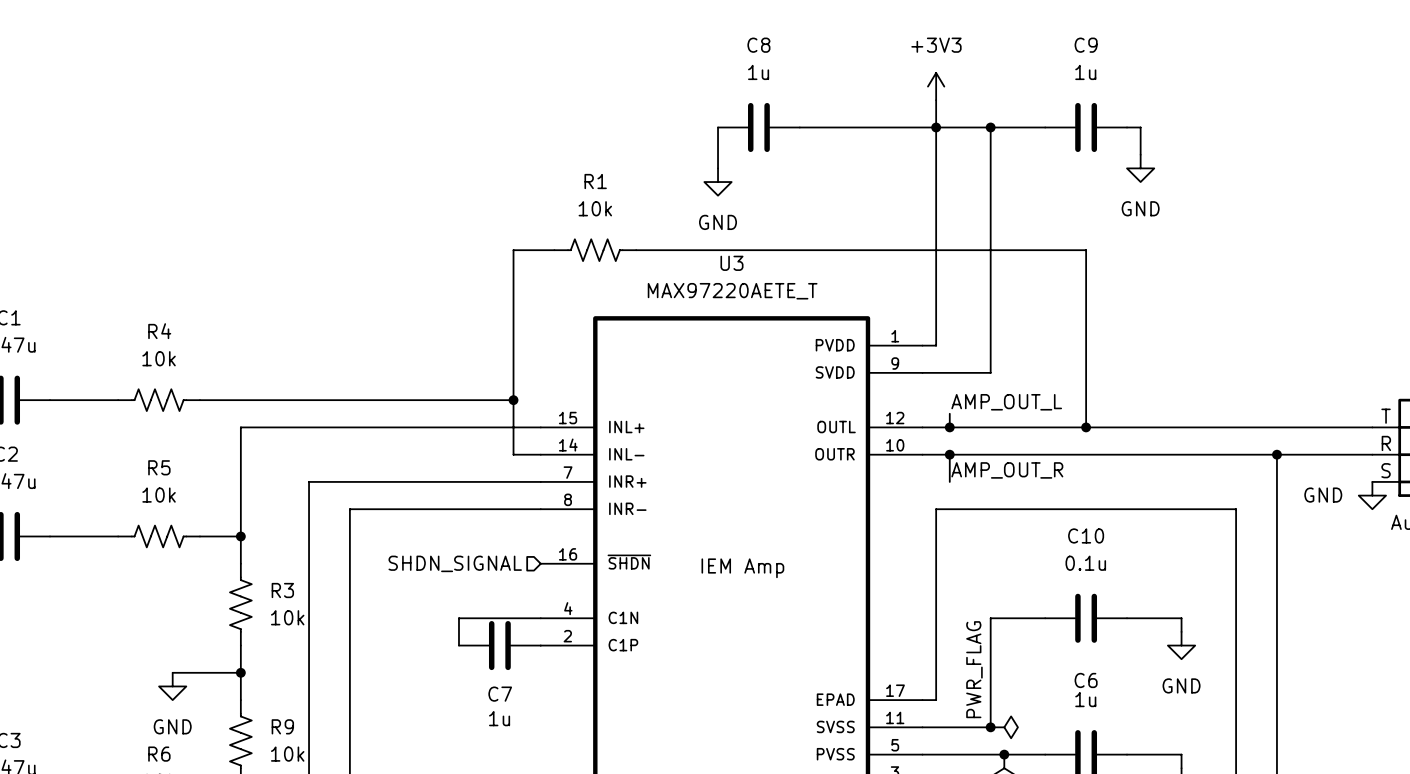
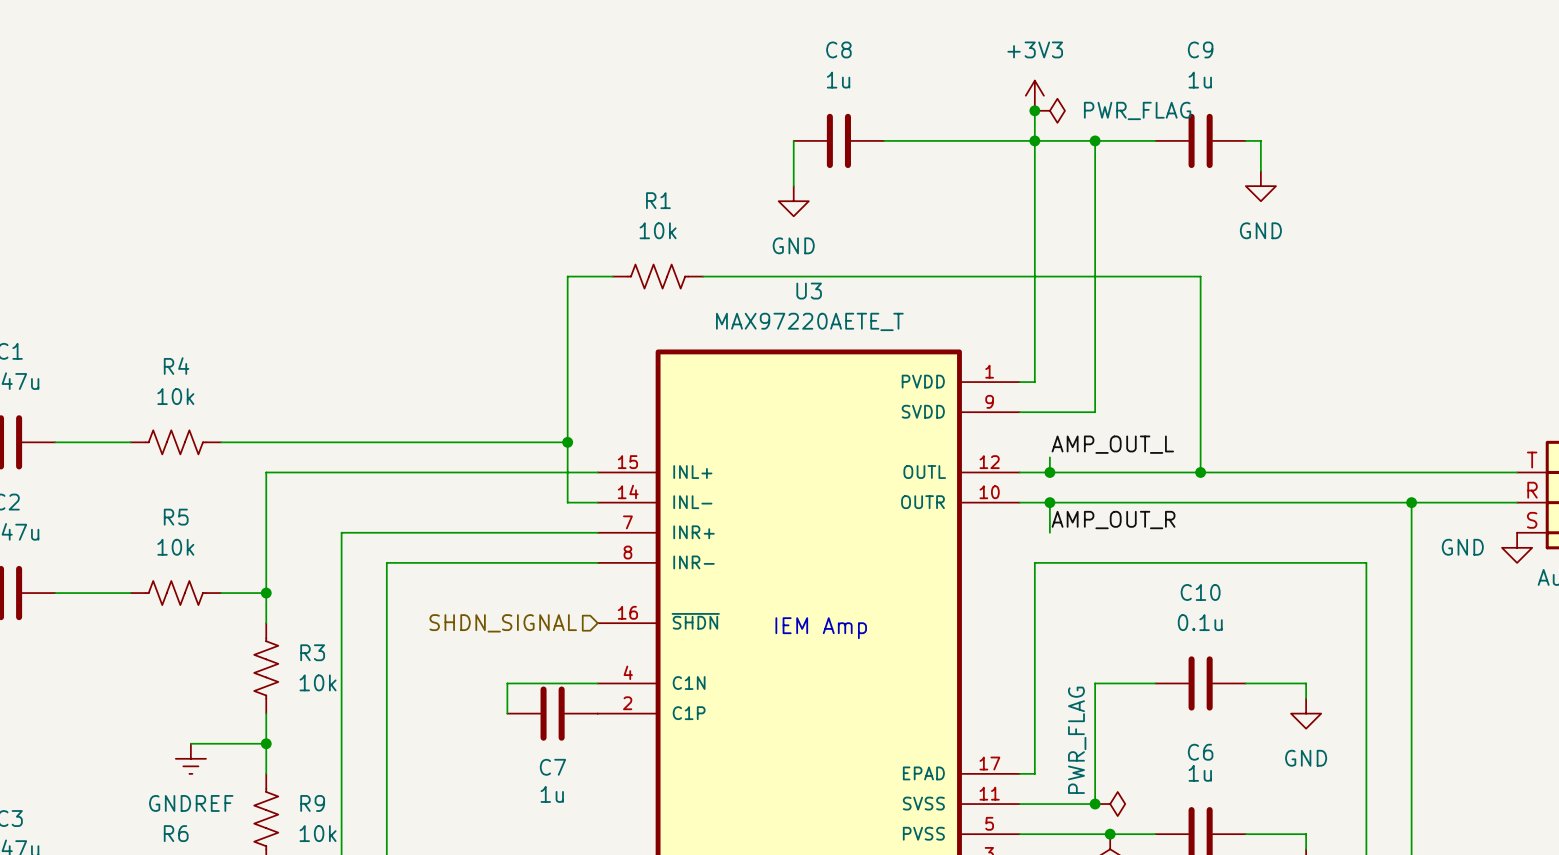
junction: none -> (1034, 110)
power symbol: none -> PWR_FLAG (1049, 110)
power symbol: GND (172, 686) -> GNDREF (190, 758)

